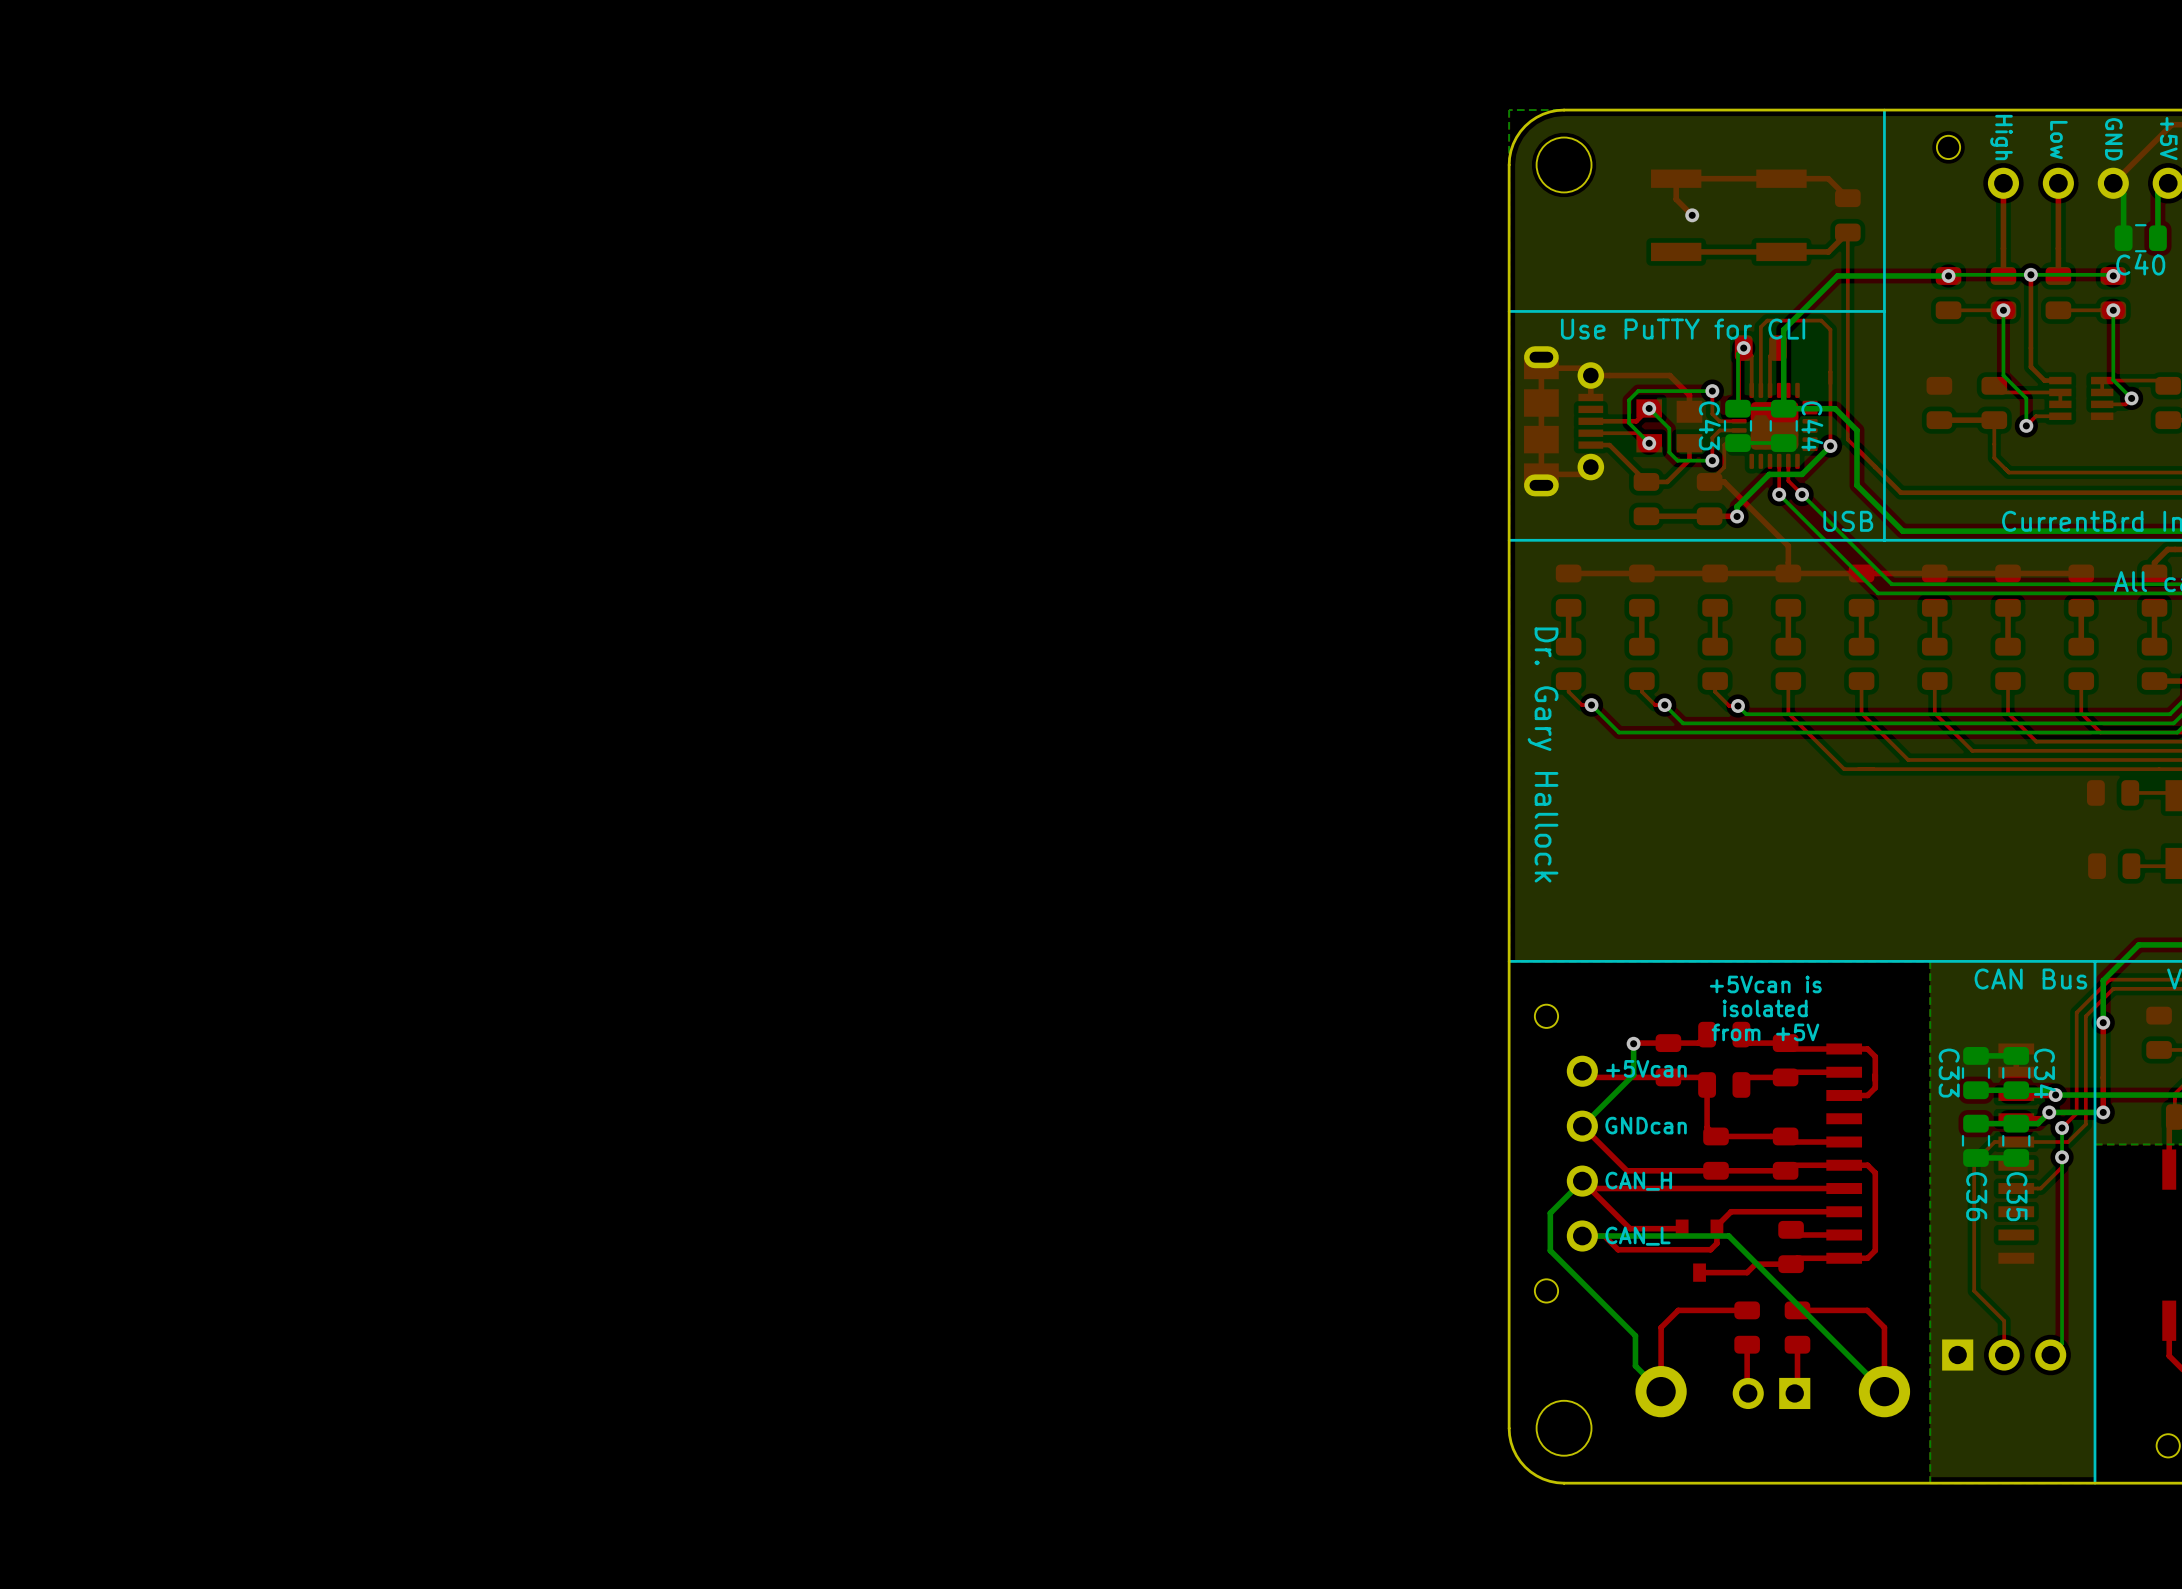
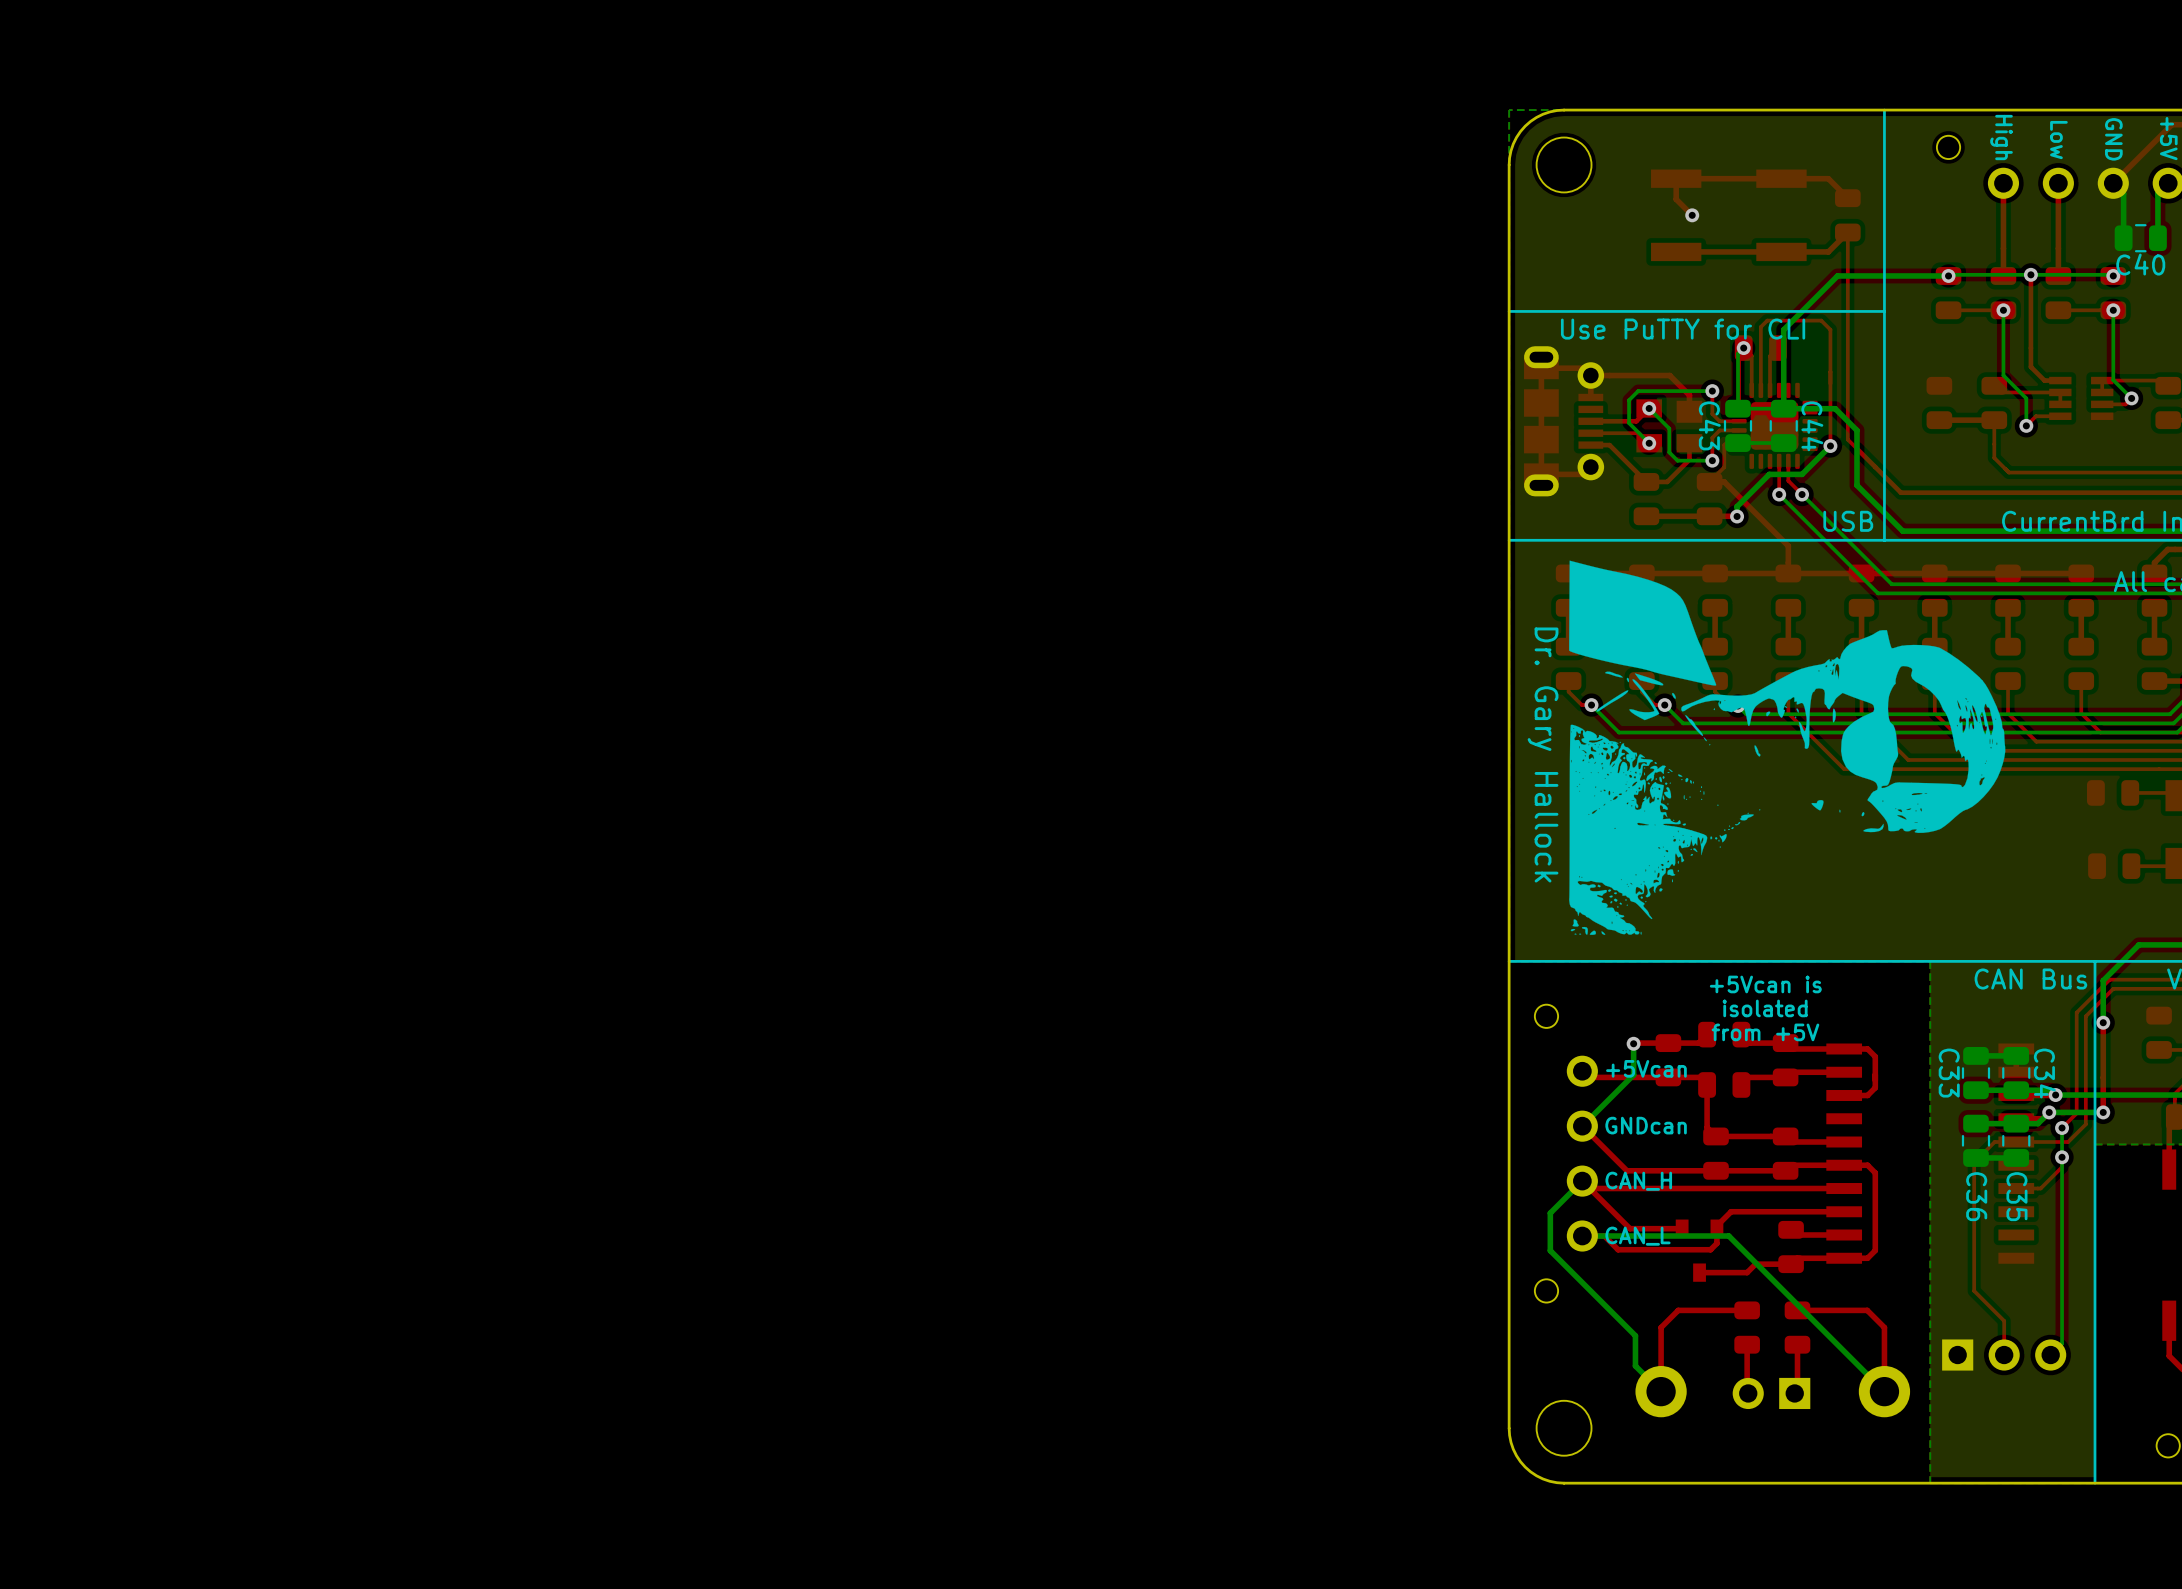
drawing: none -> [1569, 560, 2006, 935]

